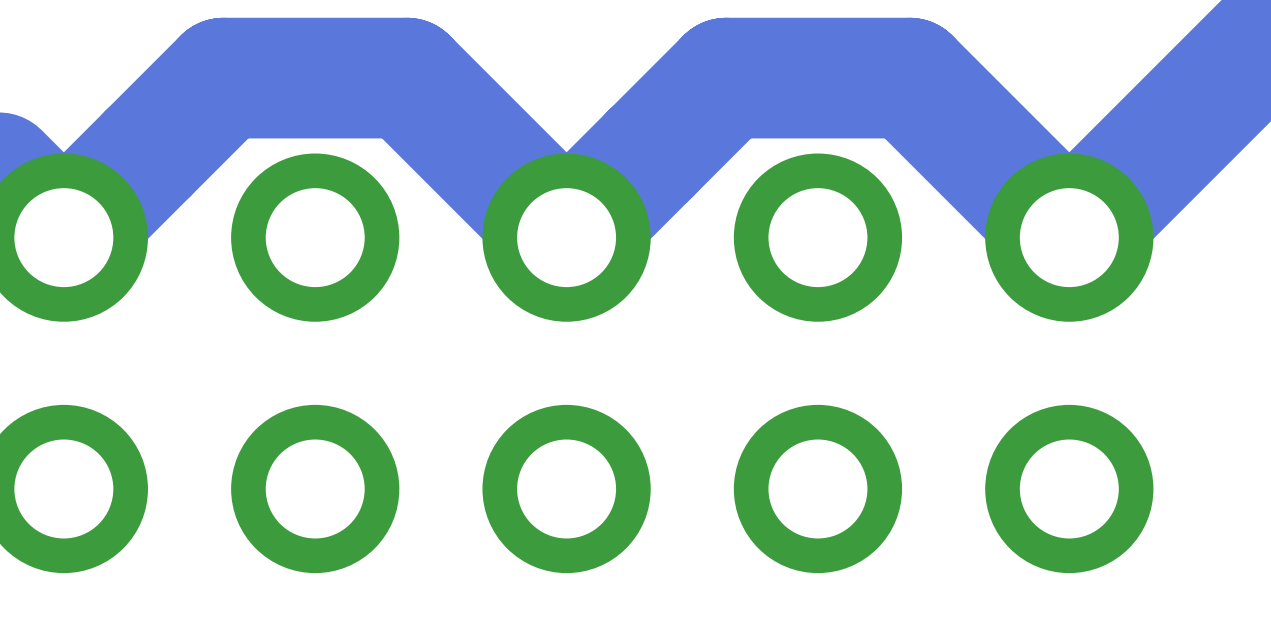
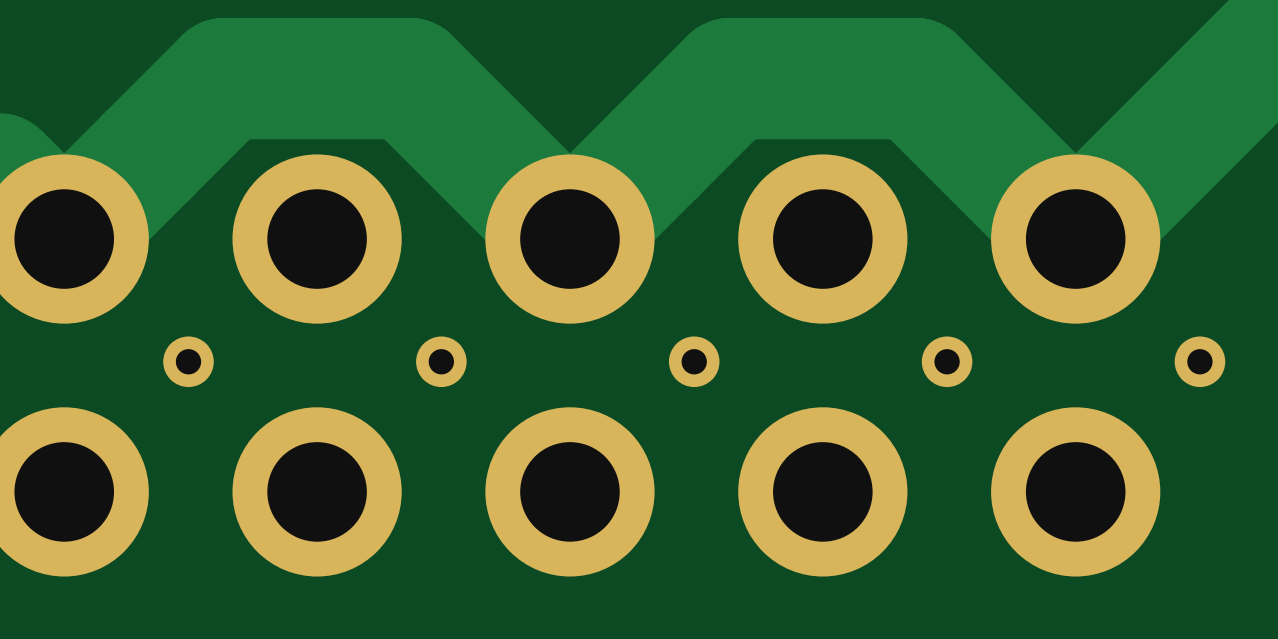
part: none -> (188, 361)
part: none -> (441, 361)
part: none -> (694, 361)
part: none -> (947, 361)
part: none -> (1199, 361)

